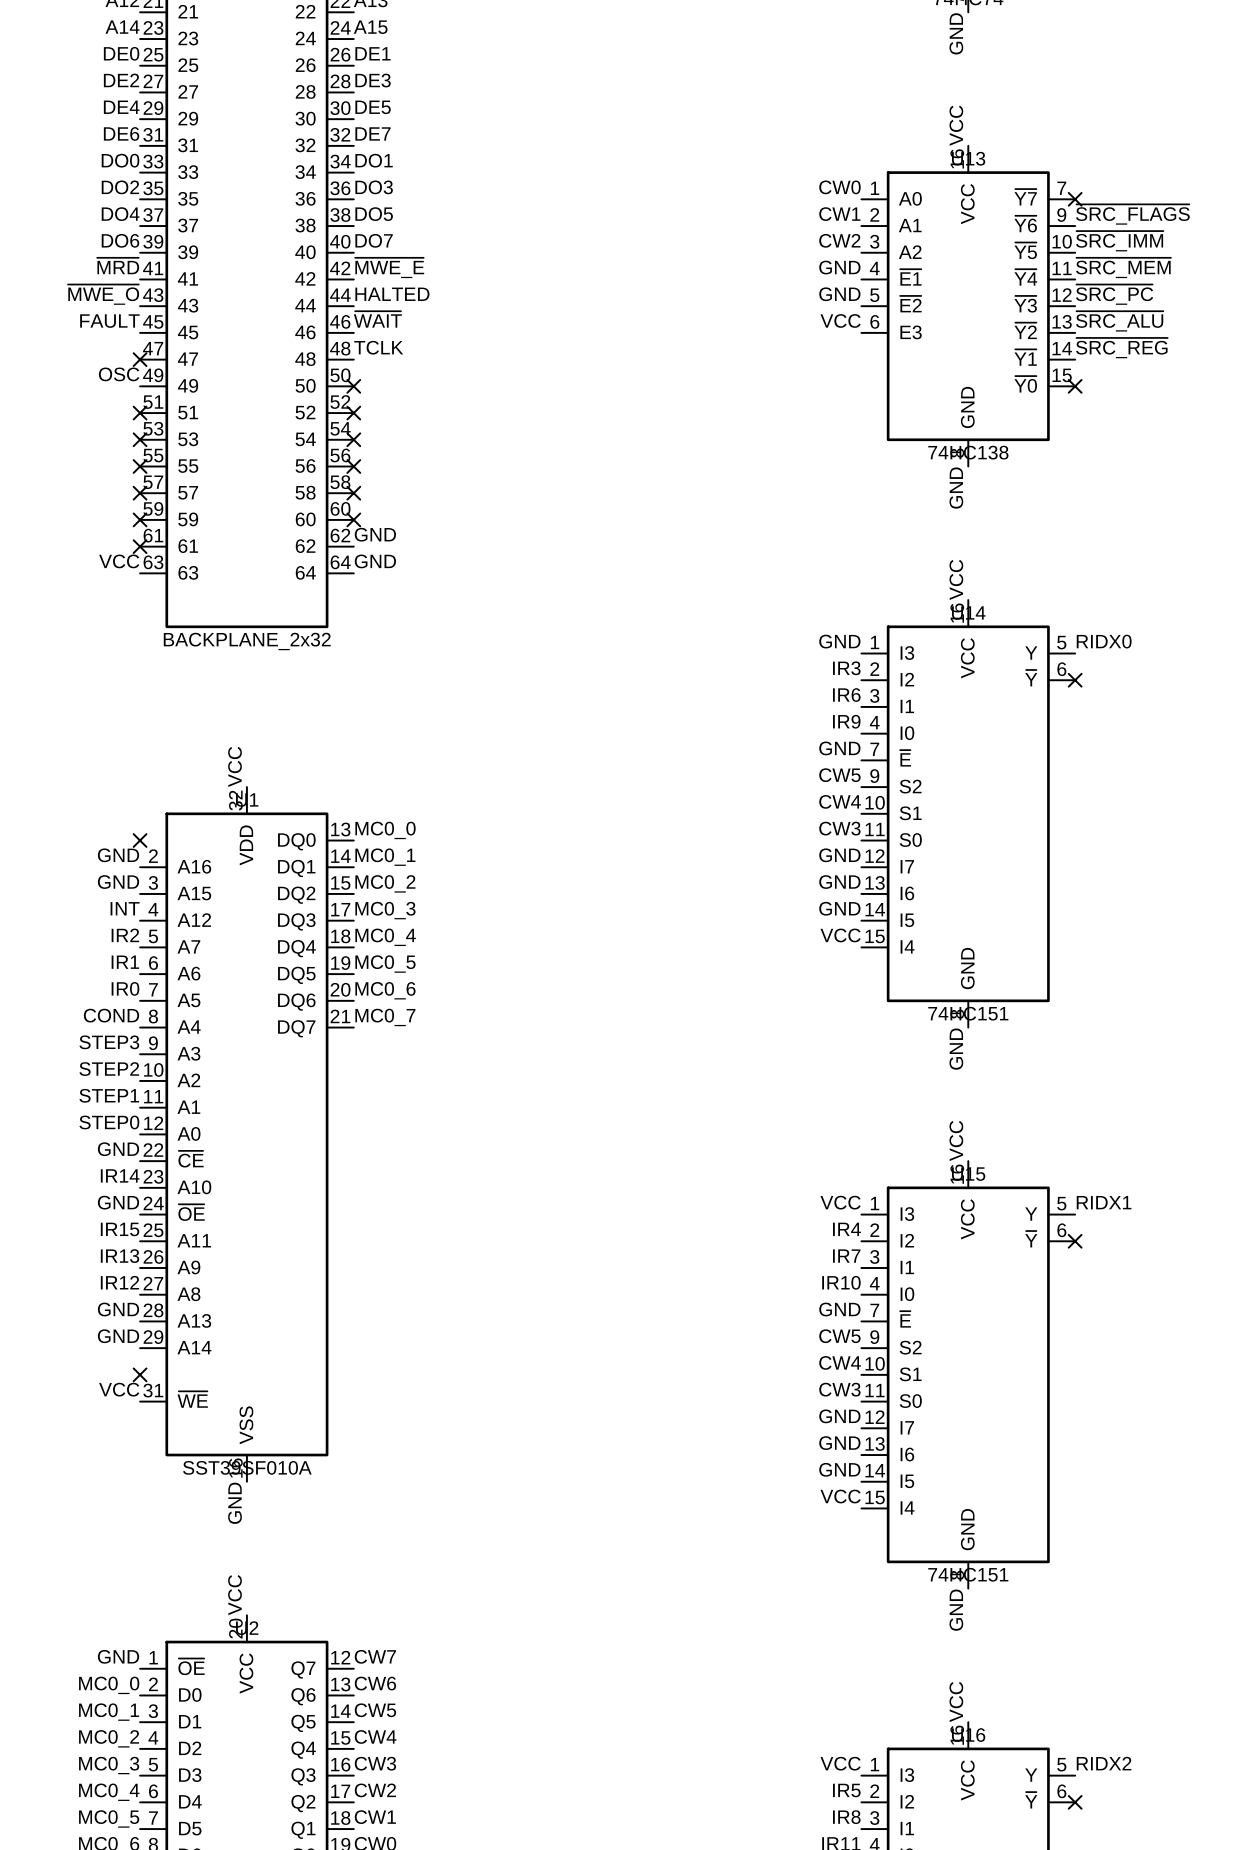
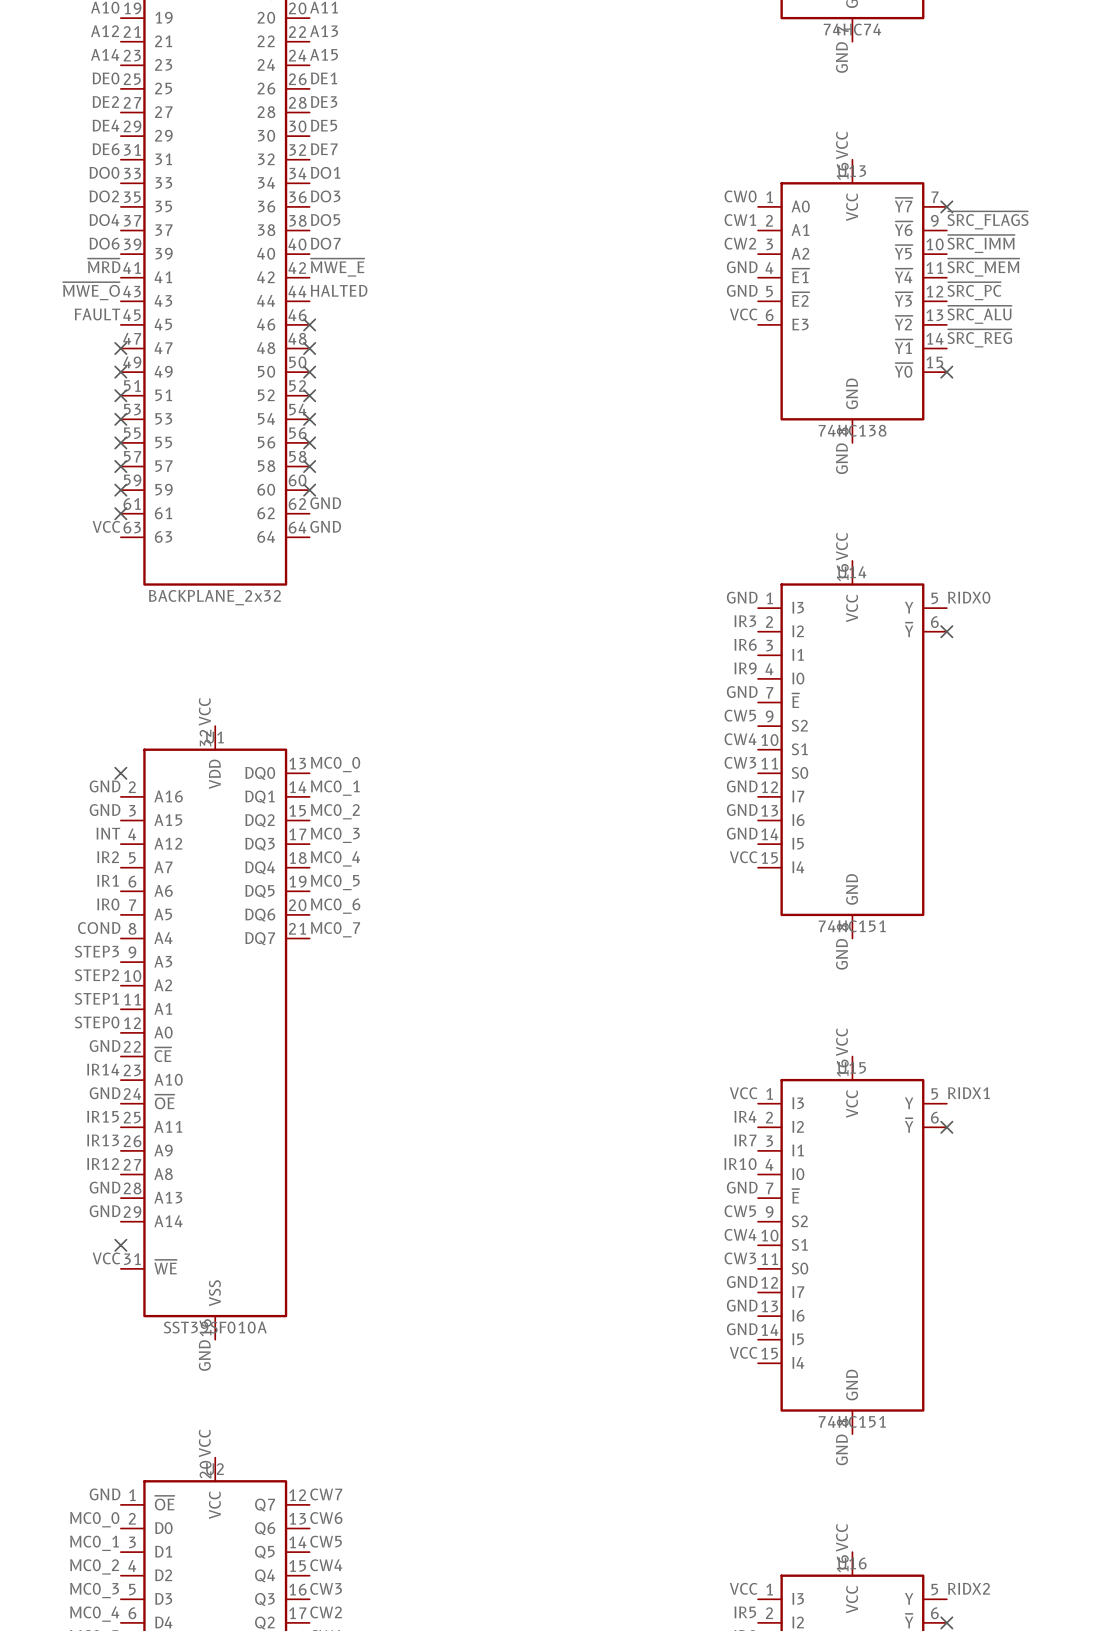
label: ~{WAIT} (377, 319) -> none
no-connect mark: none -> (309, 324)
label: TCLK (378, 347) -> none
no-connect mark: none -> (309, 348)
label: OSC (119, 374) -> none
no-connect mark: none -> (120, 372)

